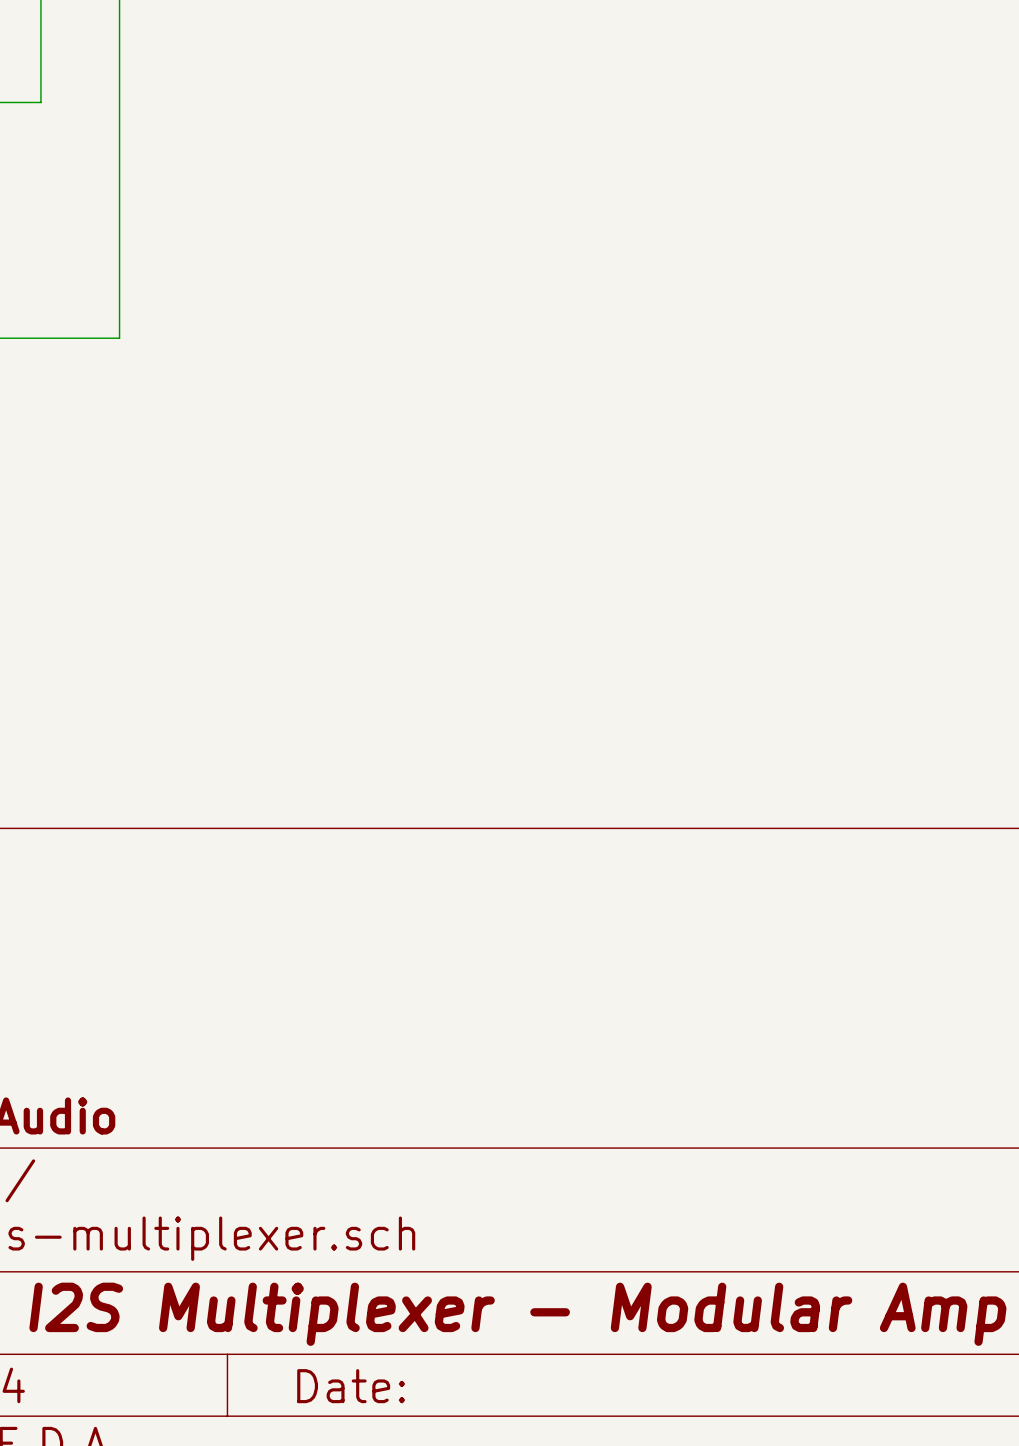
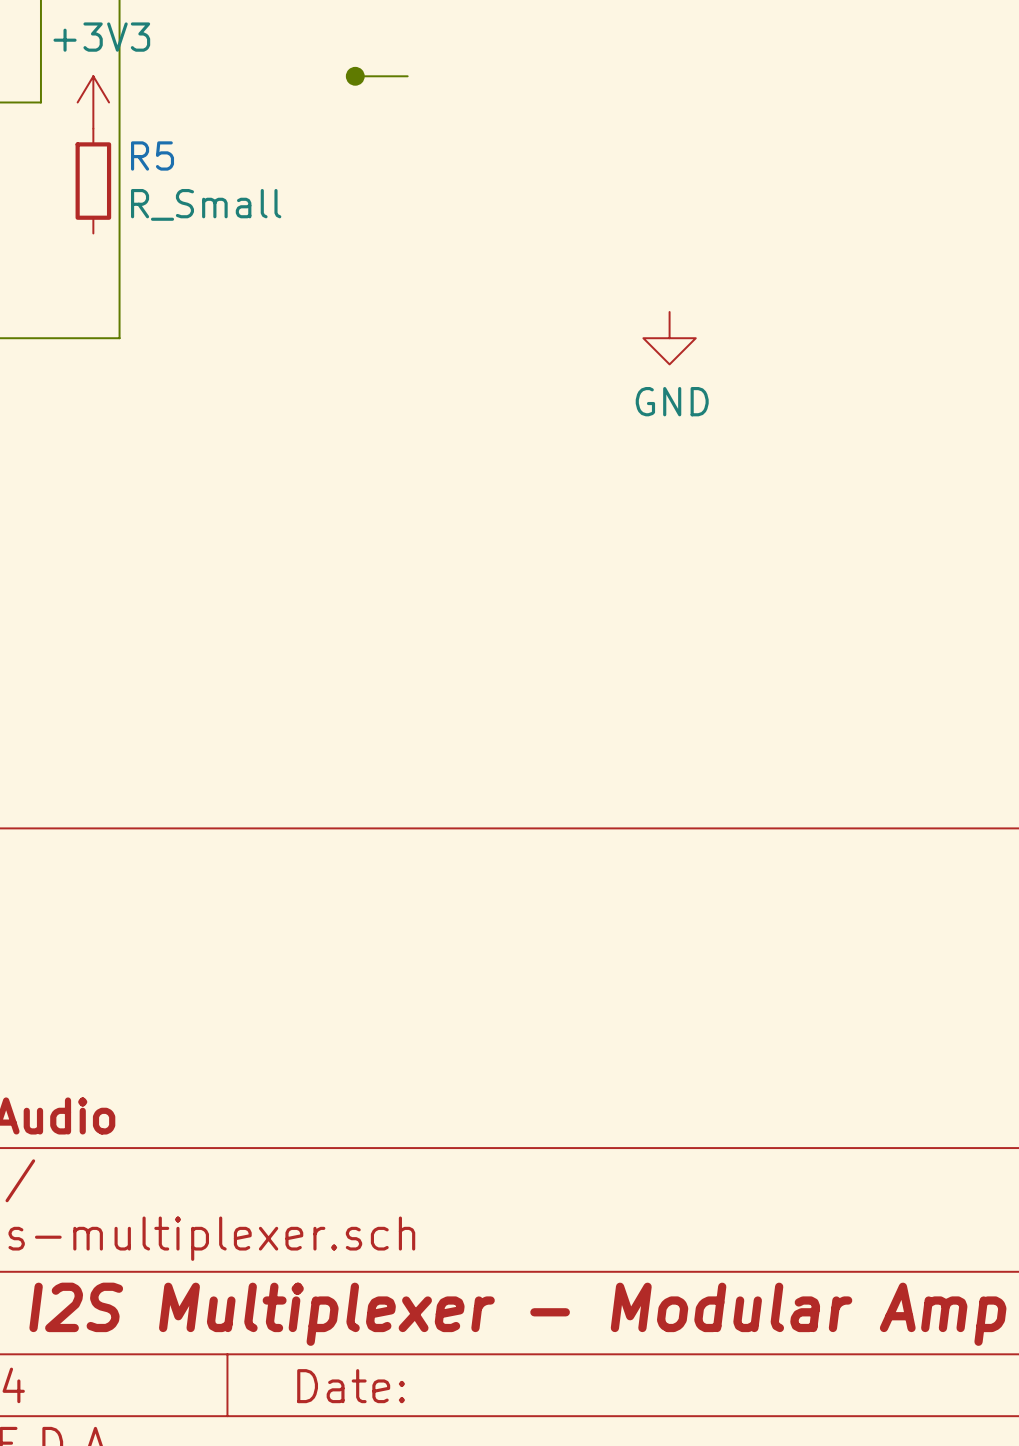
wire: none -> (355, 76) (407, 76)
junction: none -> (355, 76)
power symbol: none -> +3V3 (93, 102)
R5: none -> R_Small (93, 181)
power symbol: none -> GND (669, 338)

